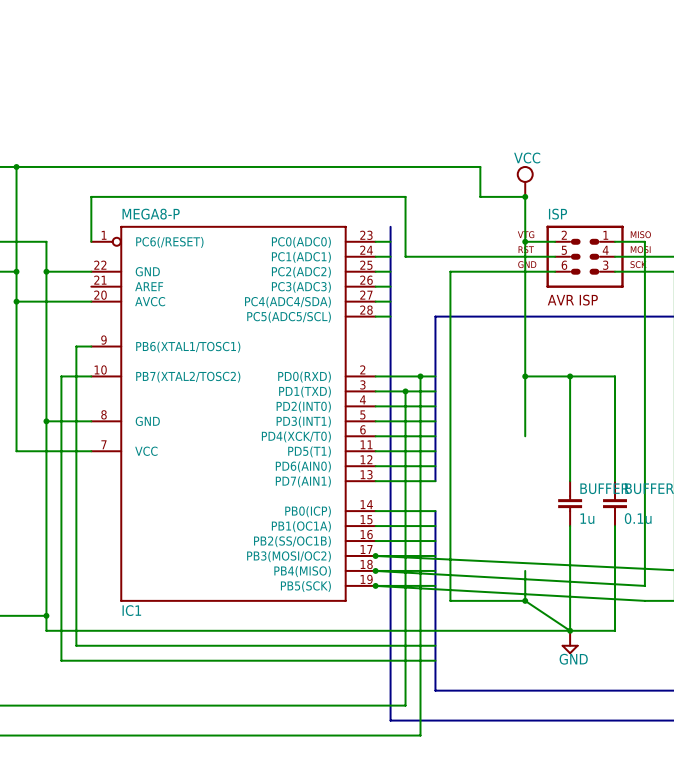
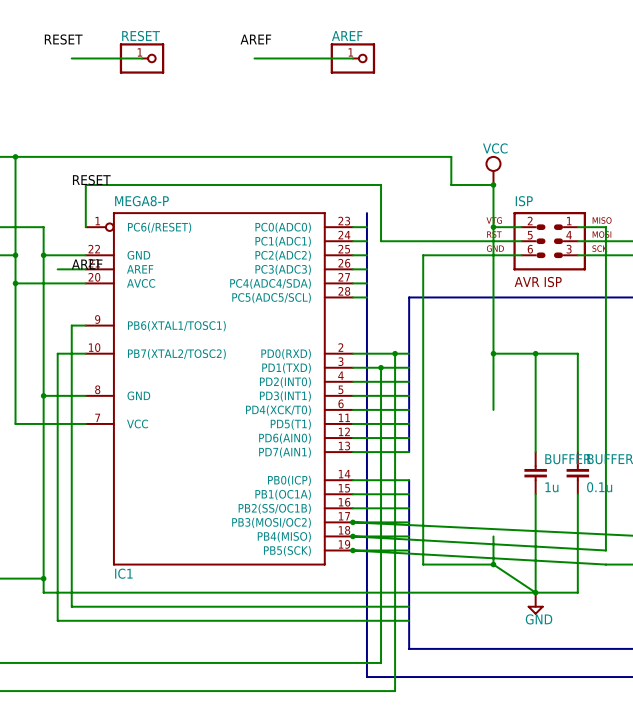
label: none -> RESET (63, 39)
label: none -> AREF (255, 39)
wire: none -> (71, 58) (142, 58)
RESET: none -> (142, 58)
wire: none -> (254, 58) (352, 58)
AREF: none -> (352, 58)
label: none -> RESET (91, 180)
label: none -> AREF (87, 264)
wire: none -> (57, 269) (85, 269)

